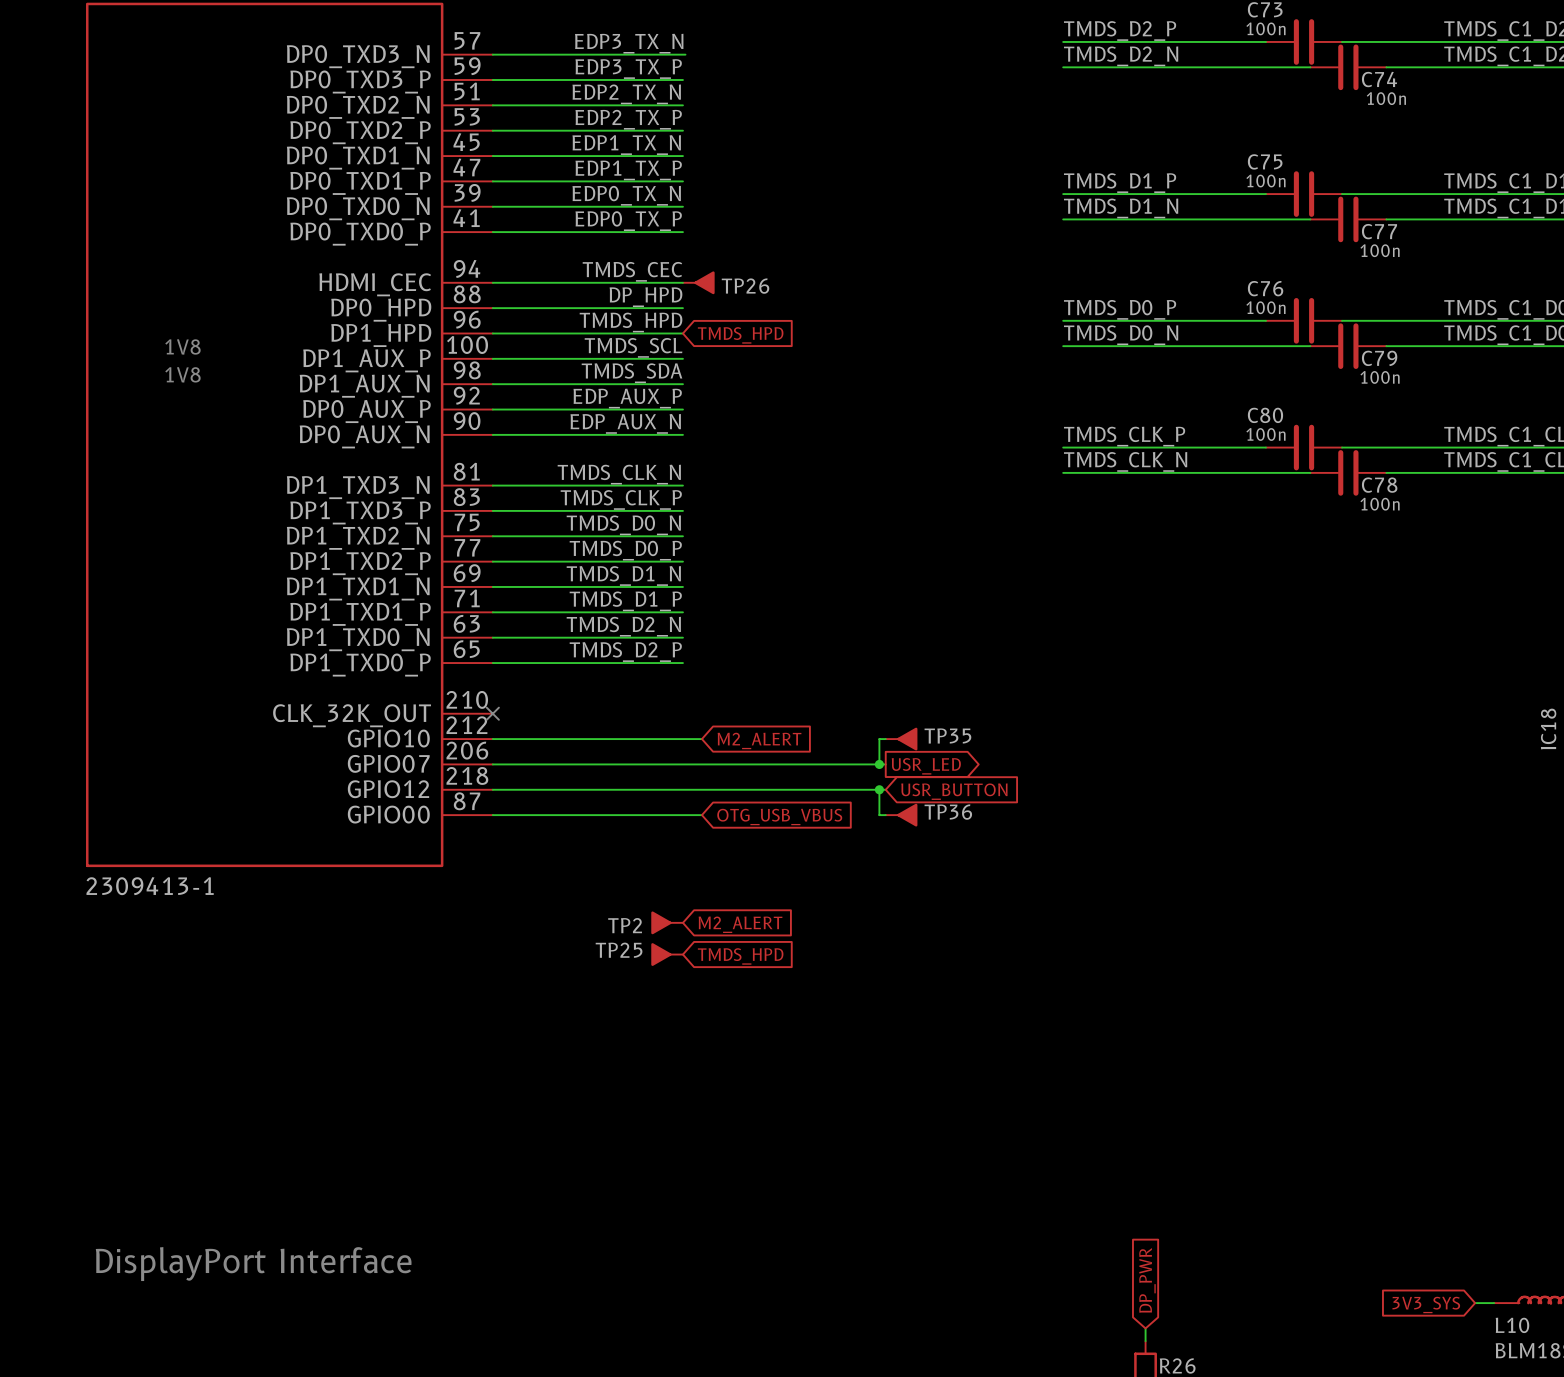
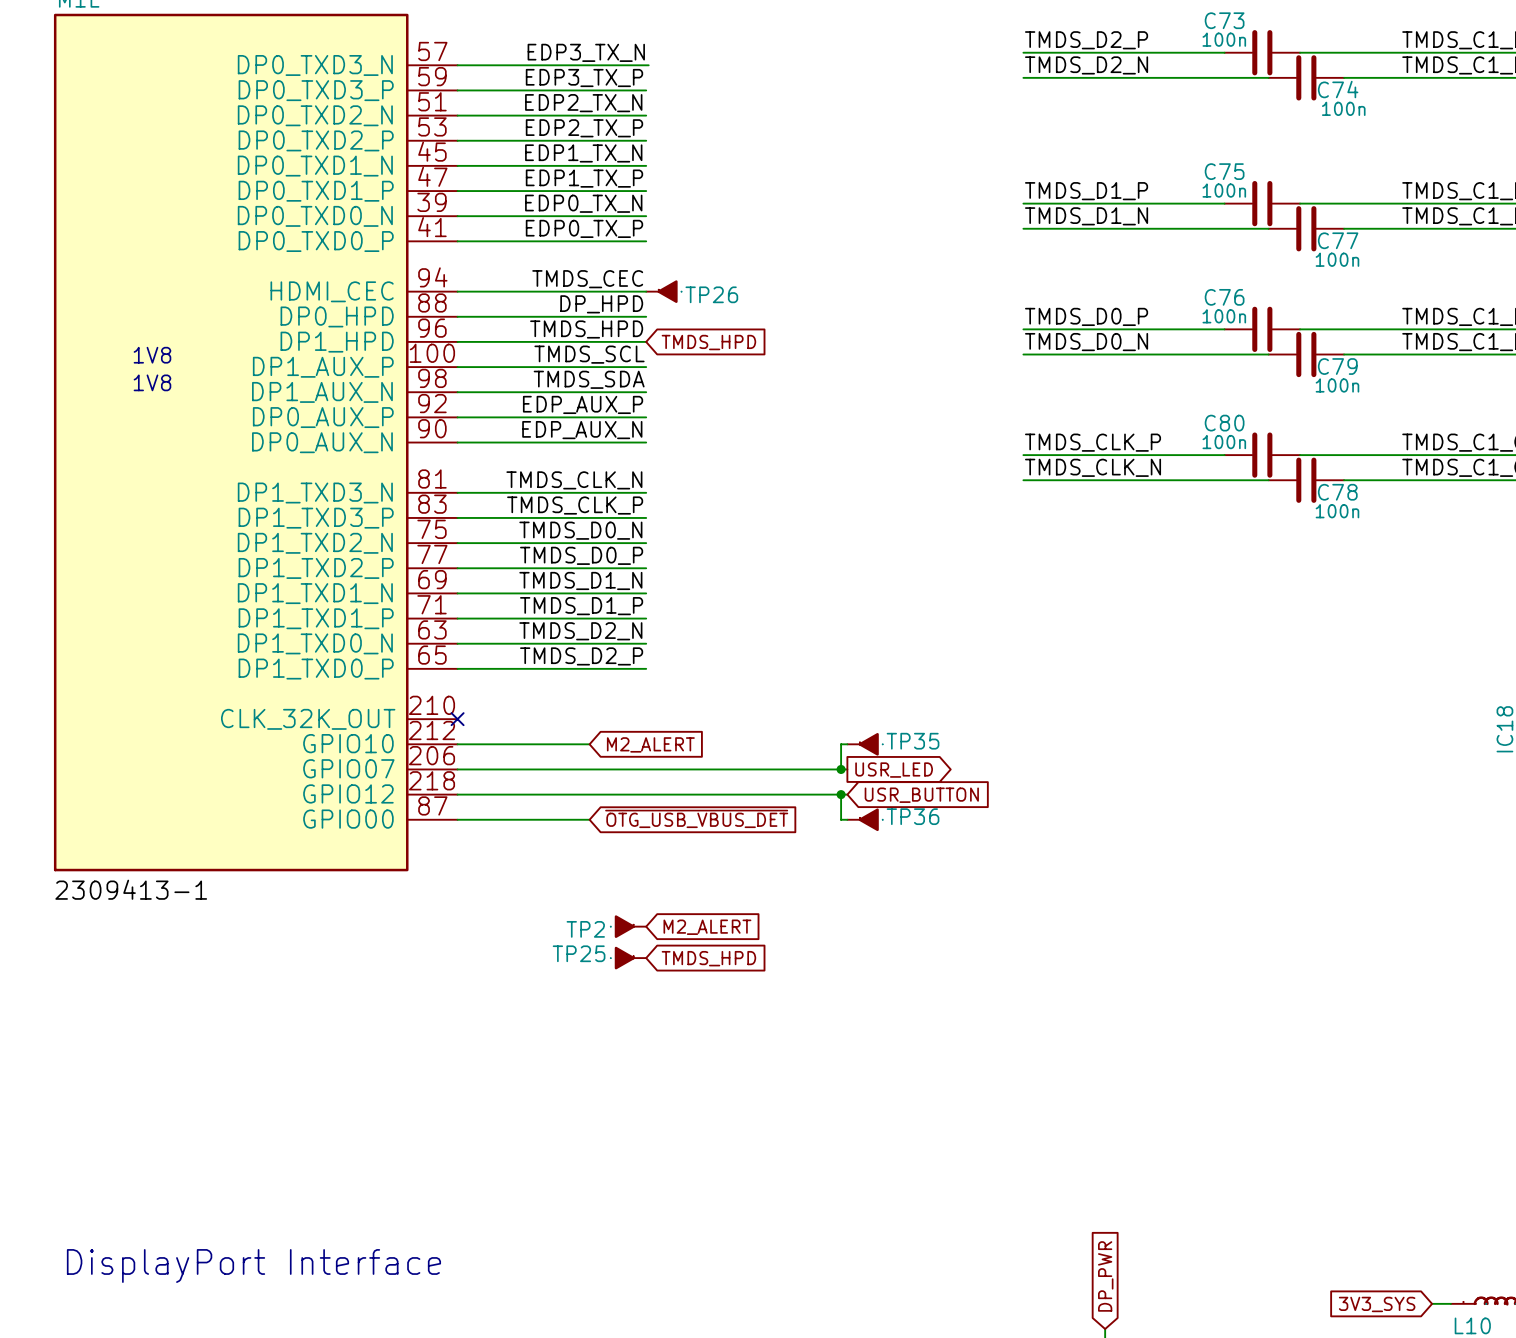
wire: (625, 739) (701, 739) -> none
global label position: M2_ALERT (759, 740) -> M2_ALERT (650, 744)
wire: (625, 815) (701, 815) -> none
global label: OTG_USB_VBUS (779, 817) -> ~{OTG_USB_VBUS_DET} (696, 818)

